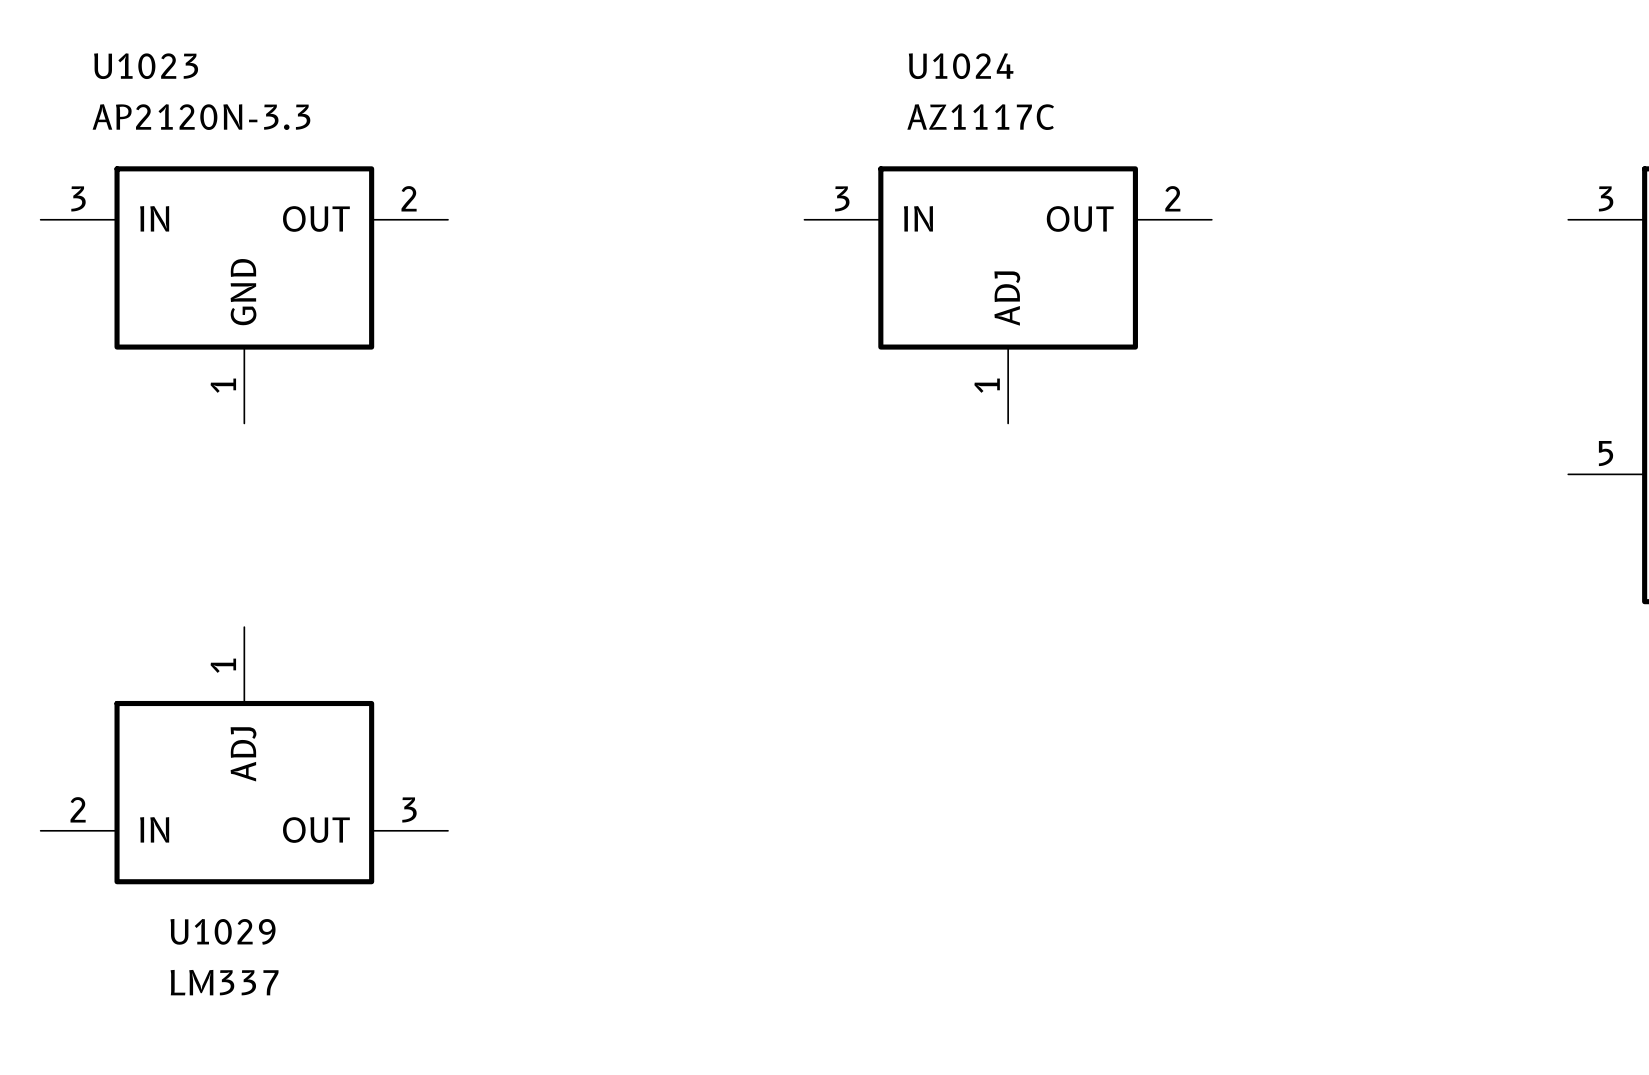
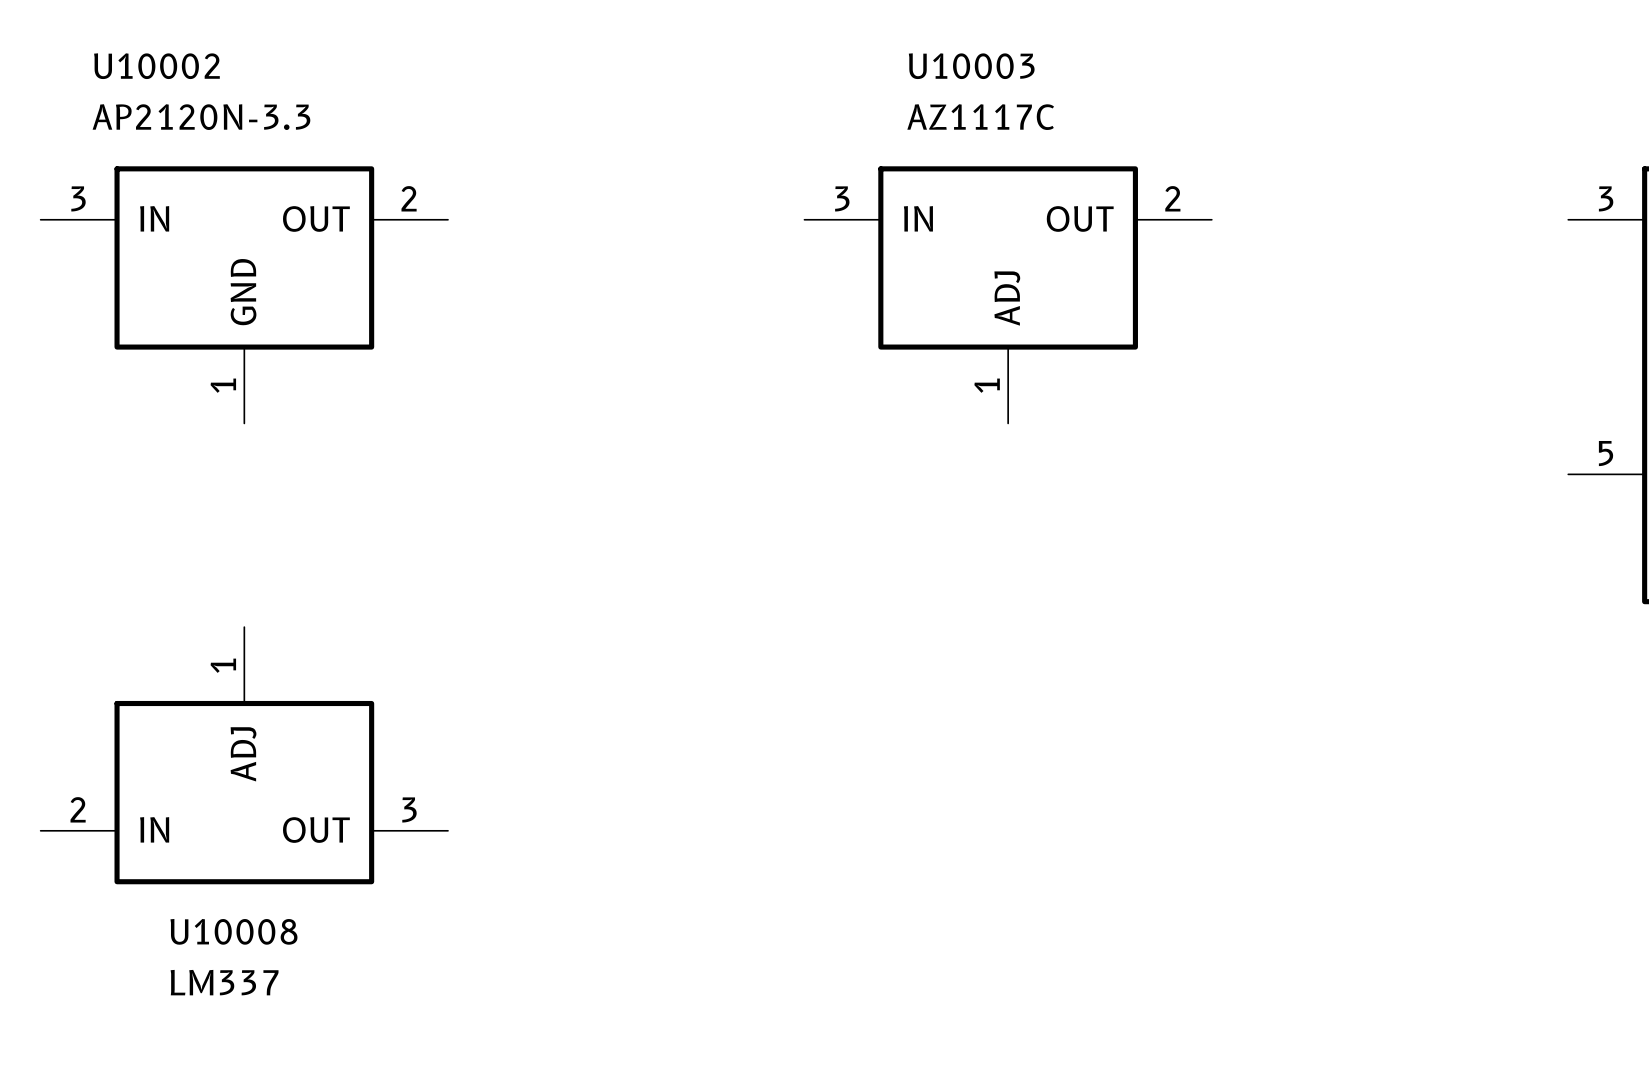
U1023 name: U1023 (146, 66) -> U10002 (156, 66)
U1024 name: U1024 (961, 66) -> U10003 (971, 66)
U1029 name: U1029 (222, 931) -> U10008 (233, 931)

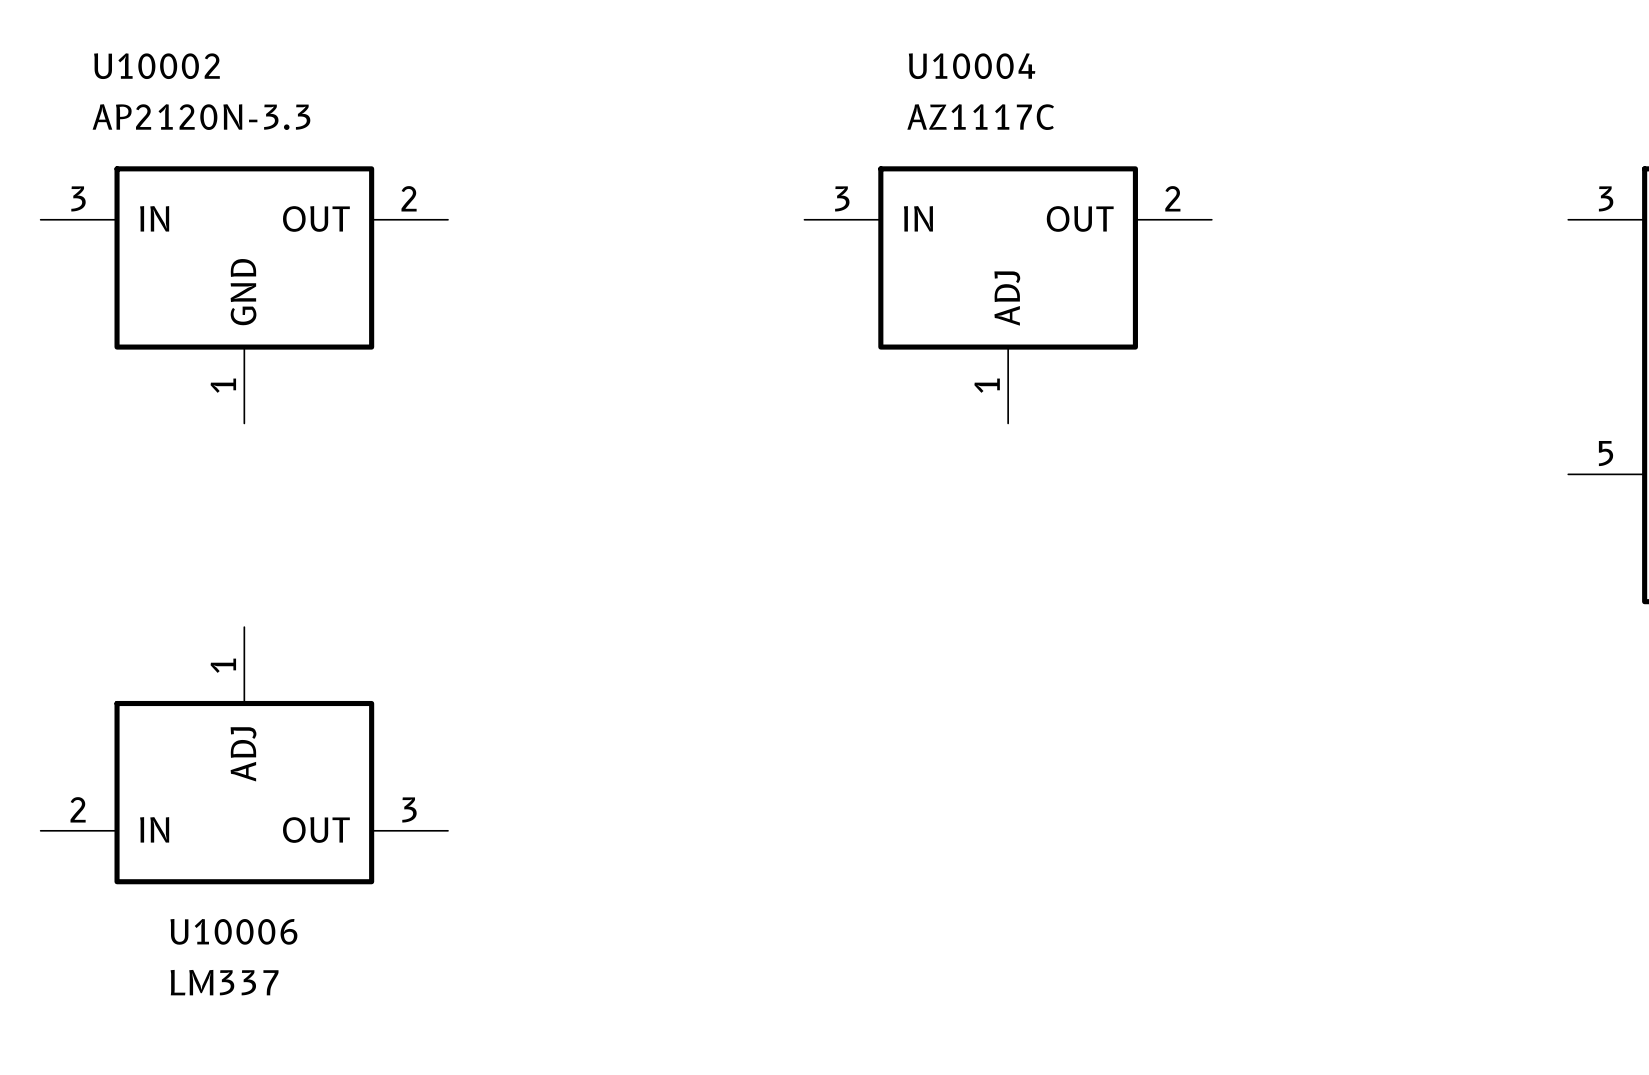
U10003 name: U10003 (971, 66) -> U10004 (972, 66)
U10008 name: U10008 (233, 931) -> U10006 (233, 931)

